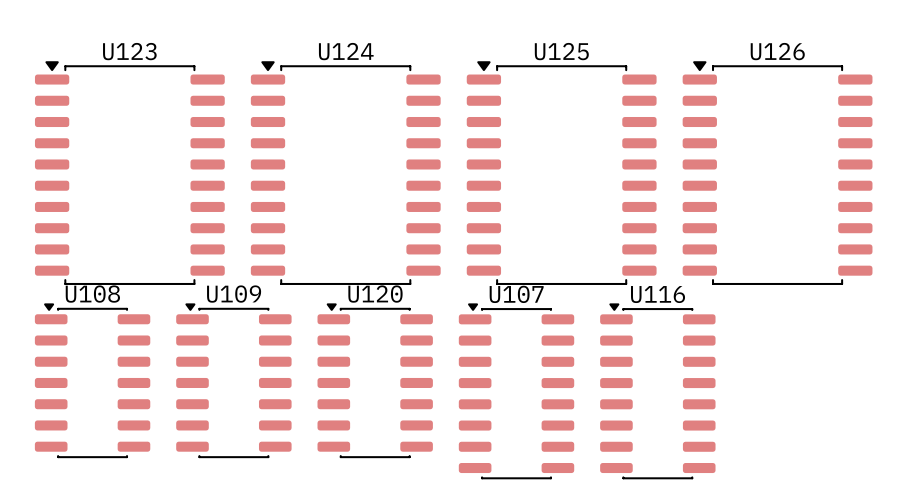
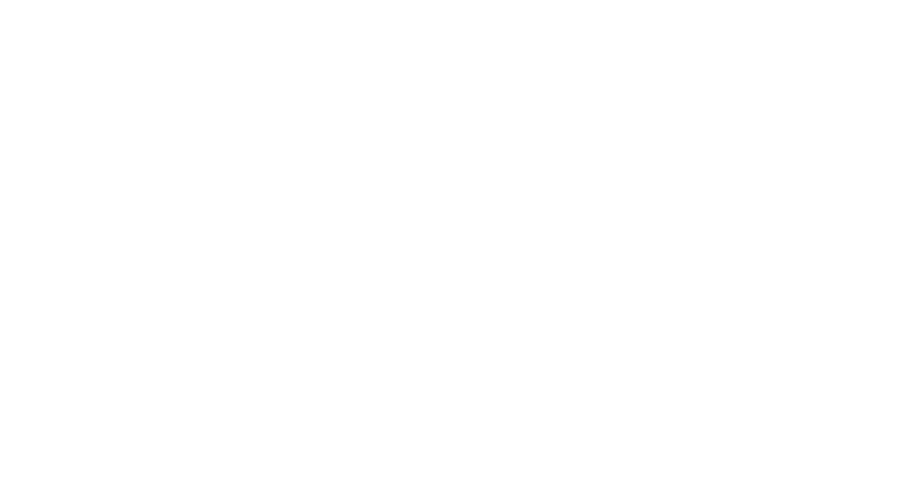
U123: (129, 173) -> none
U124: (345, 173) -> none
U125: (561, 173) -> none
U126: (777, 173) -> none
U108: (92, 380) -> none
U109: (233, 380) -> none
U120: (375, 380) -> none
U107: (516, 391) -> none
U116: (657, 391) -> none

